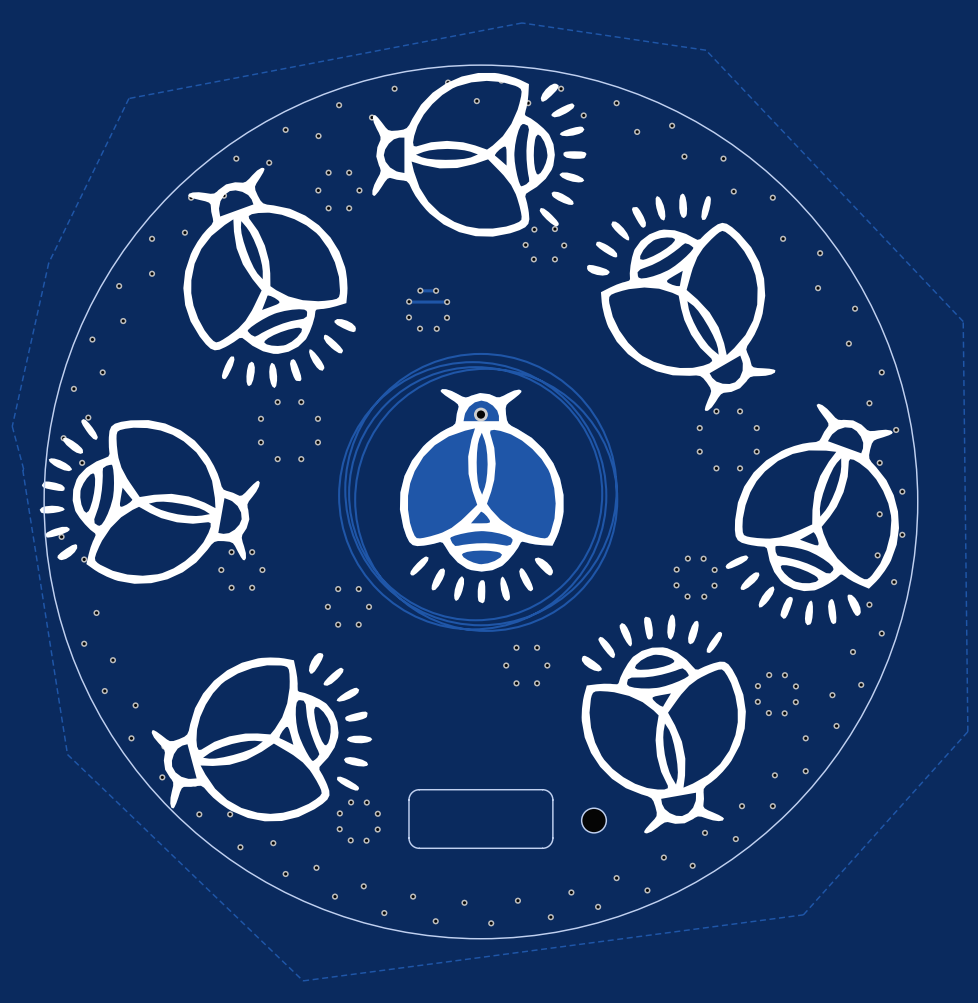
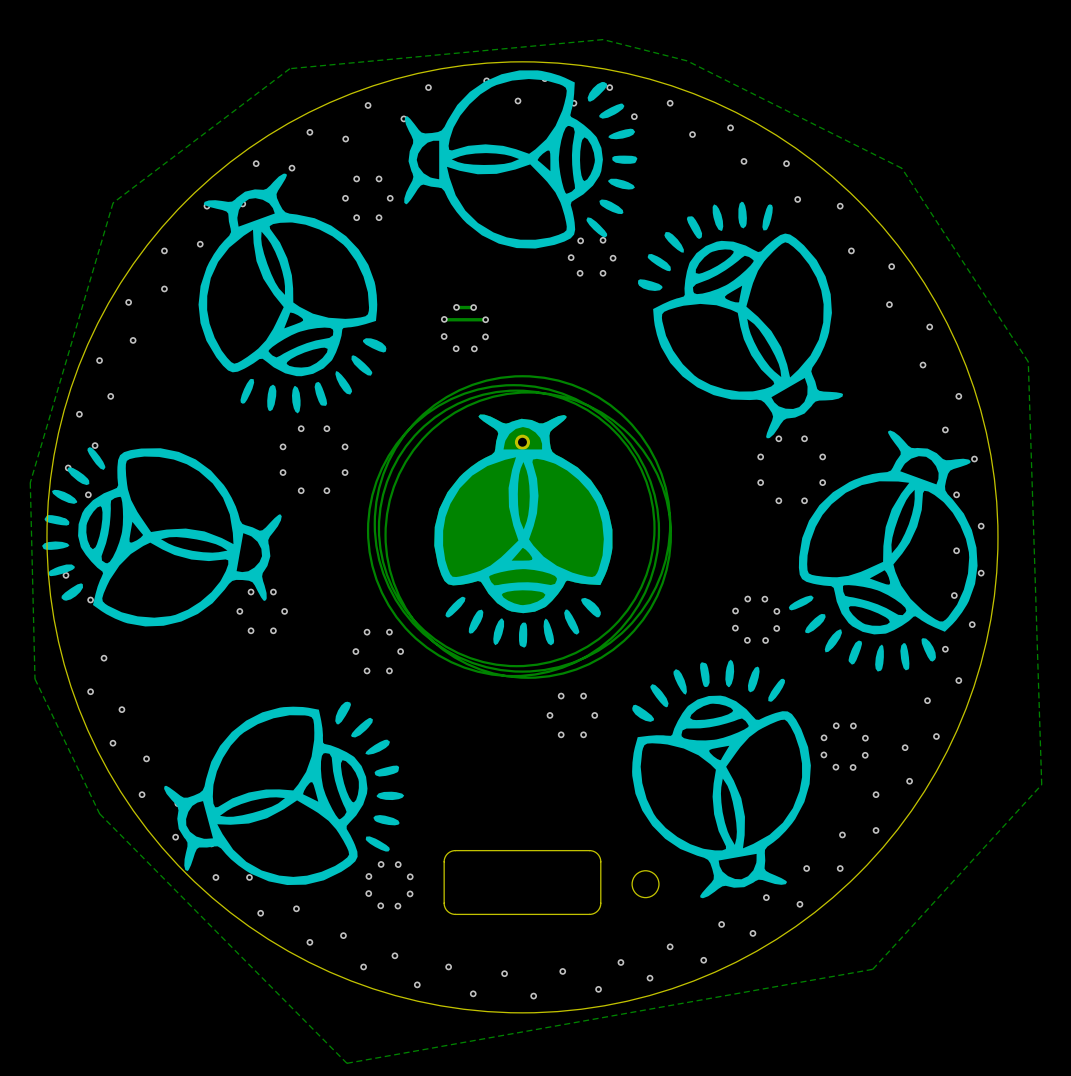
zone outline: (522, 22) (706, 50) (963, 321) (967, 731) (803, 914) (303, 980) (67, 754) (23, 469) (12, 426) (48, 262) (128, 98) (522, 22) -> (603, 39) (687, 60) (901, 168) (1028, 361) (1041, 784) (872, 969) (346, 1063) (99, 813) (34, 678) (30, 482) (113, 202) (289, 68) (603, 39)

